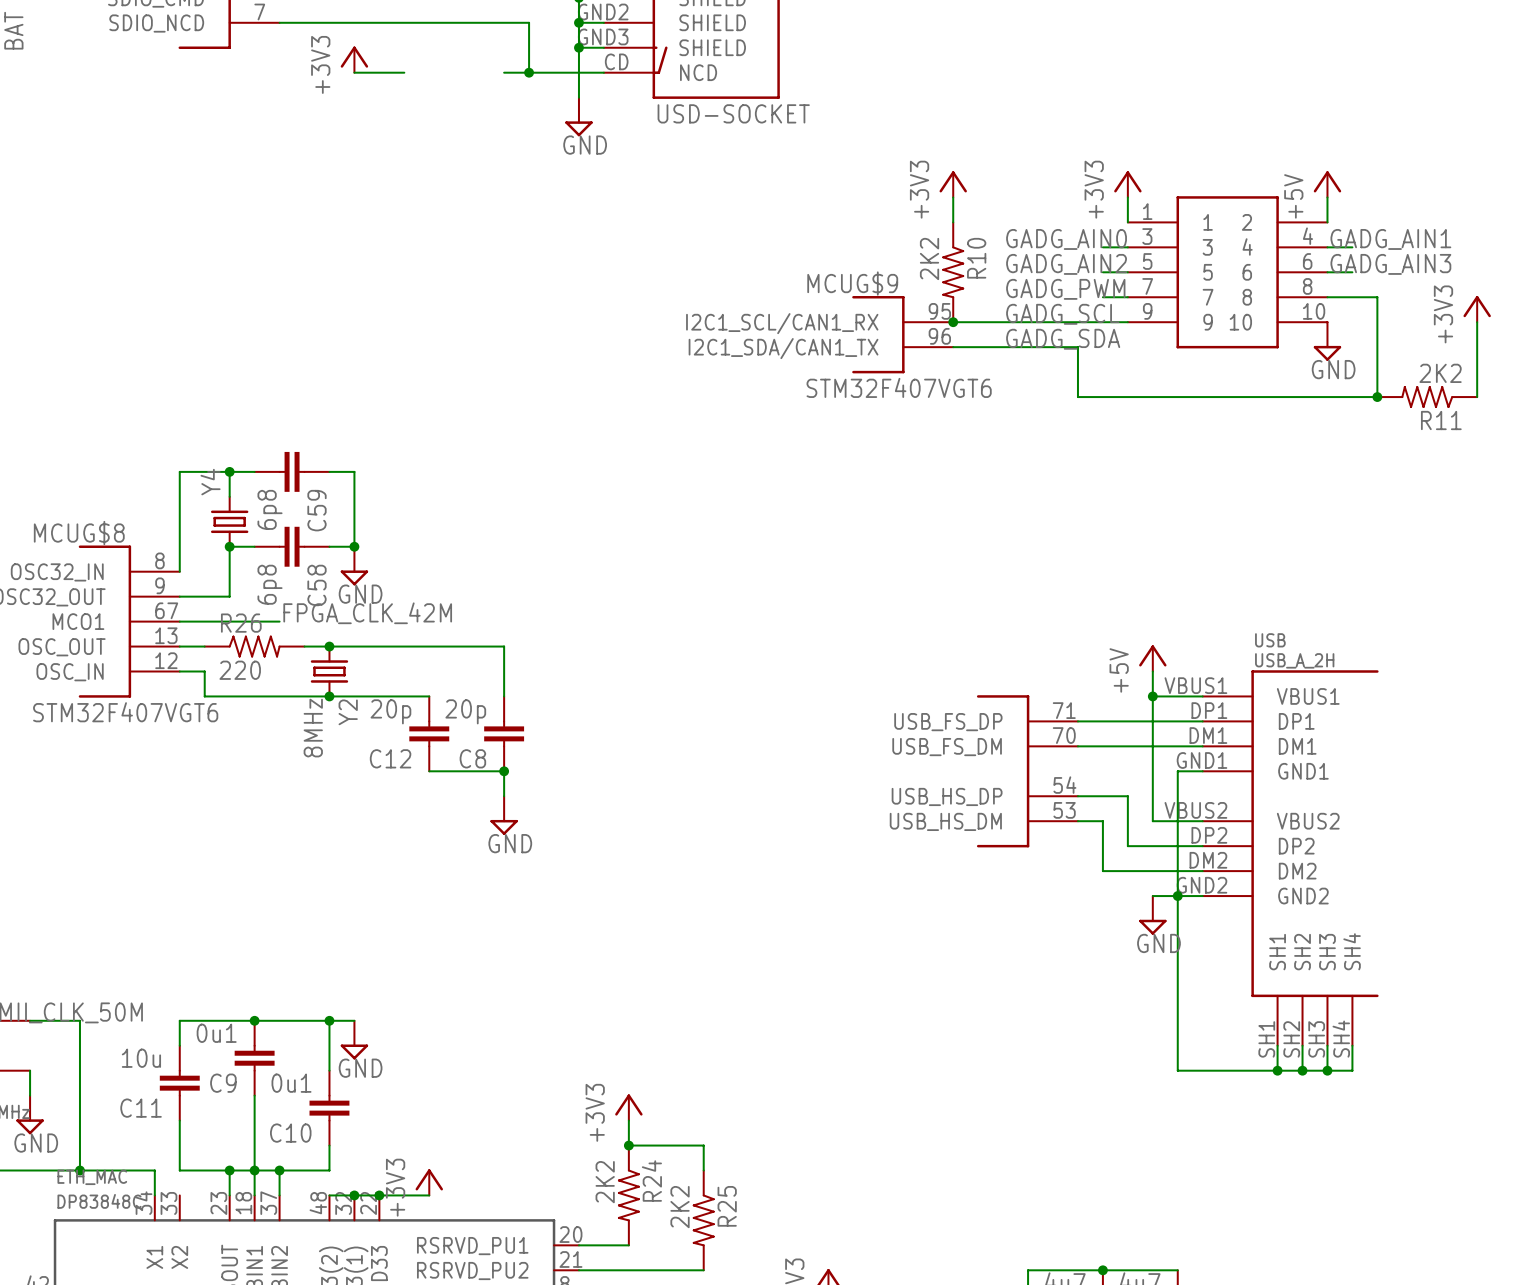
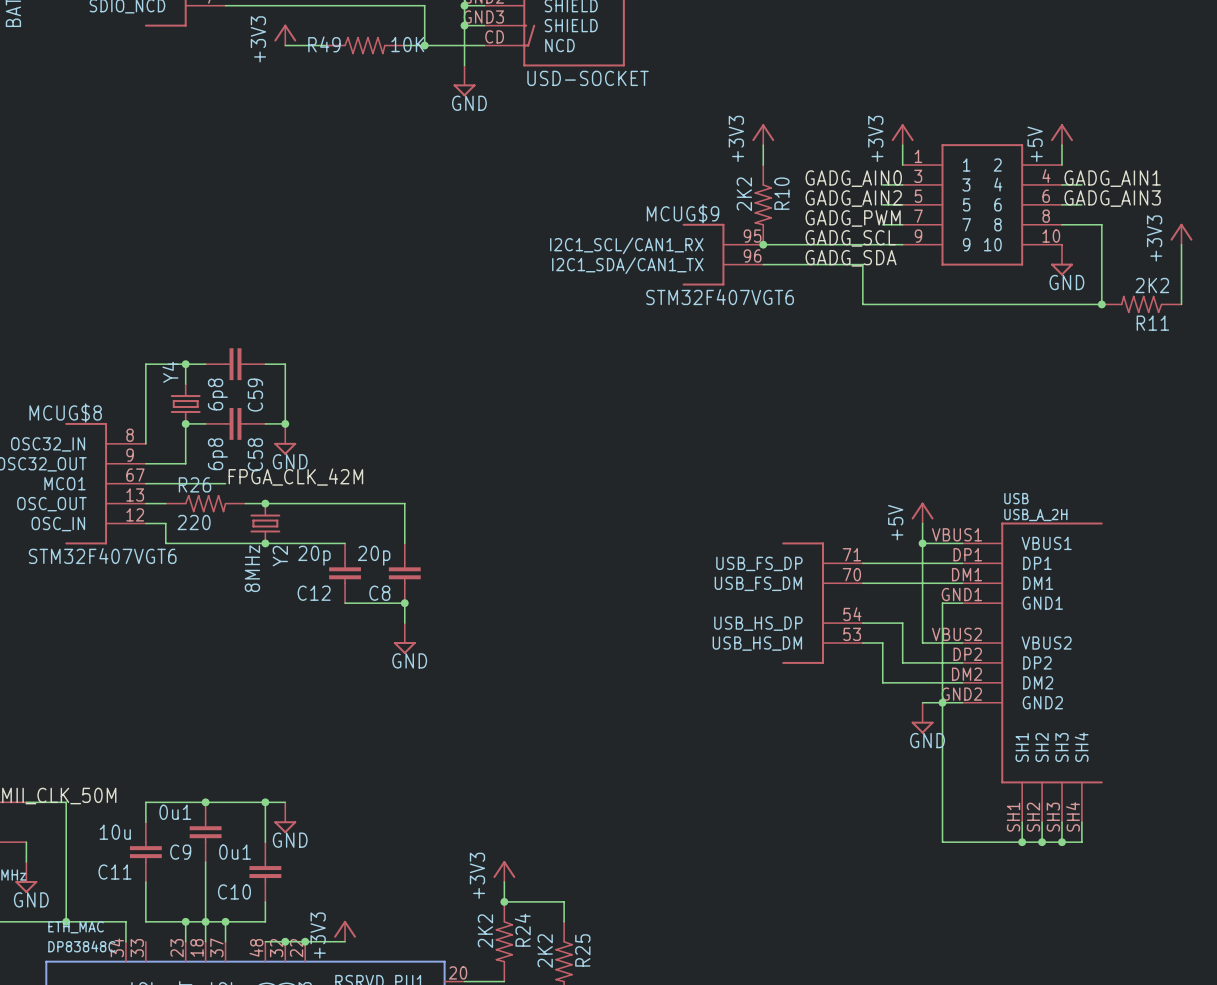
R49: none -> 10K (364, 45)

